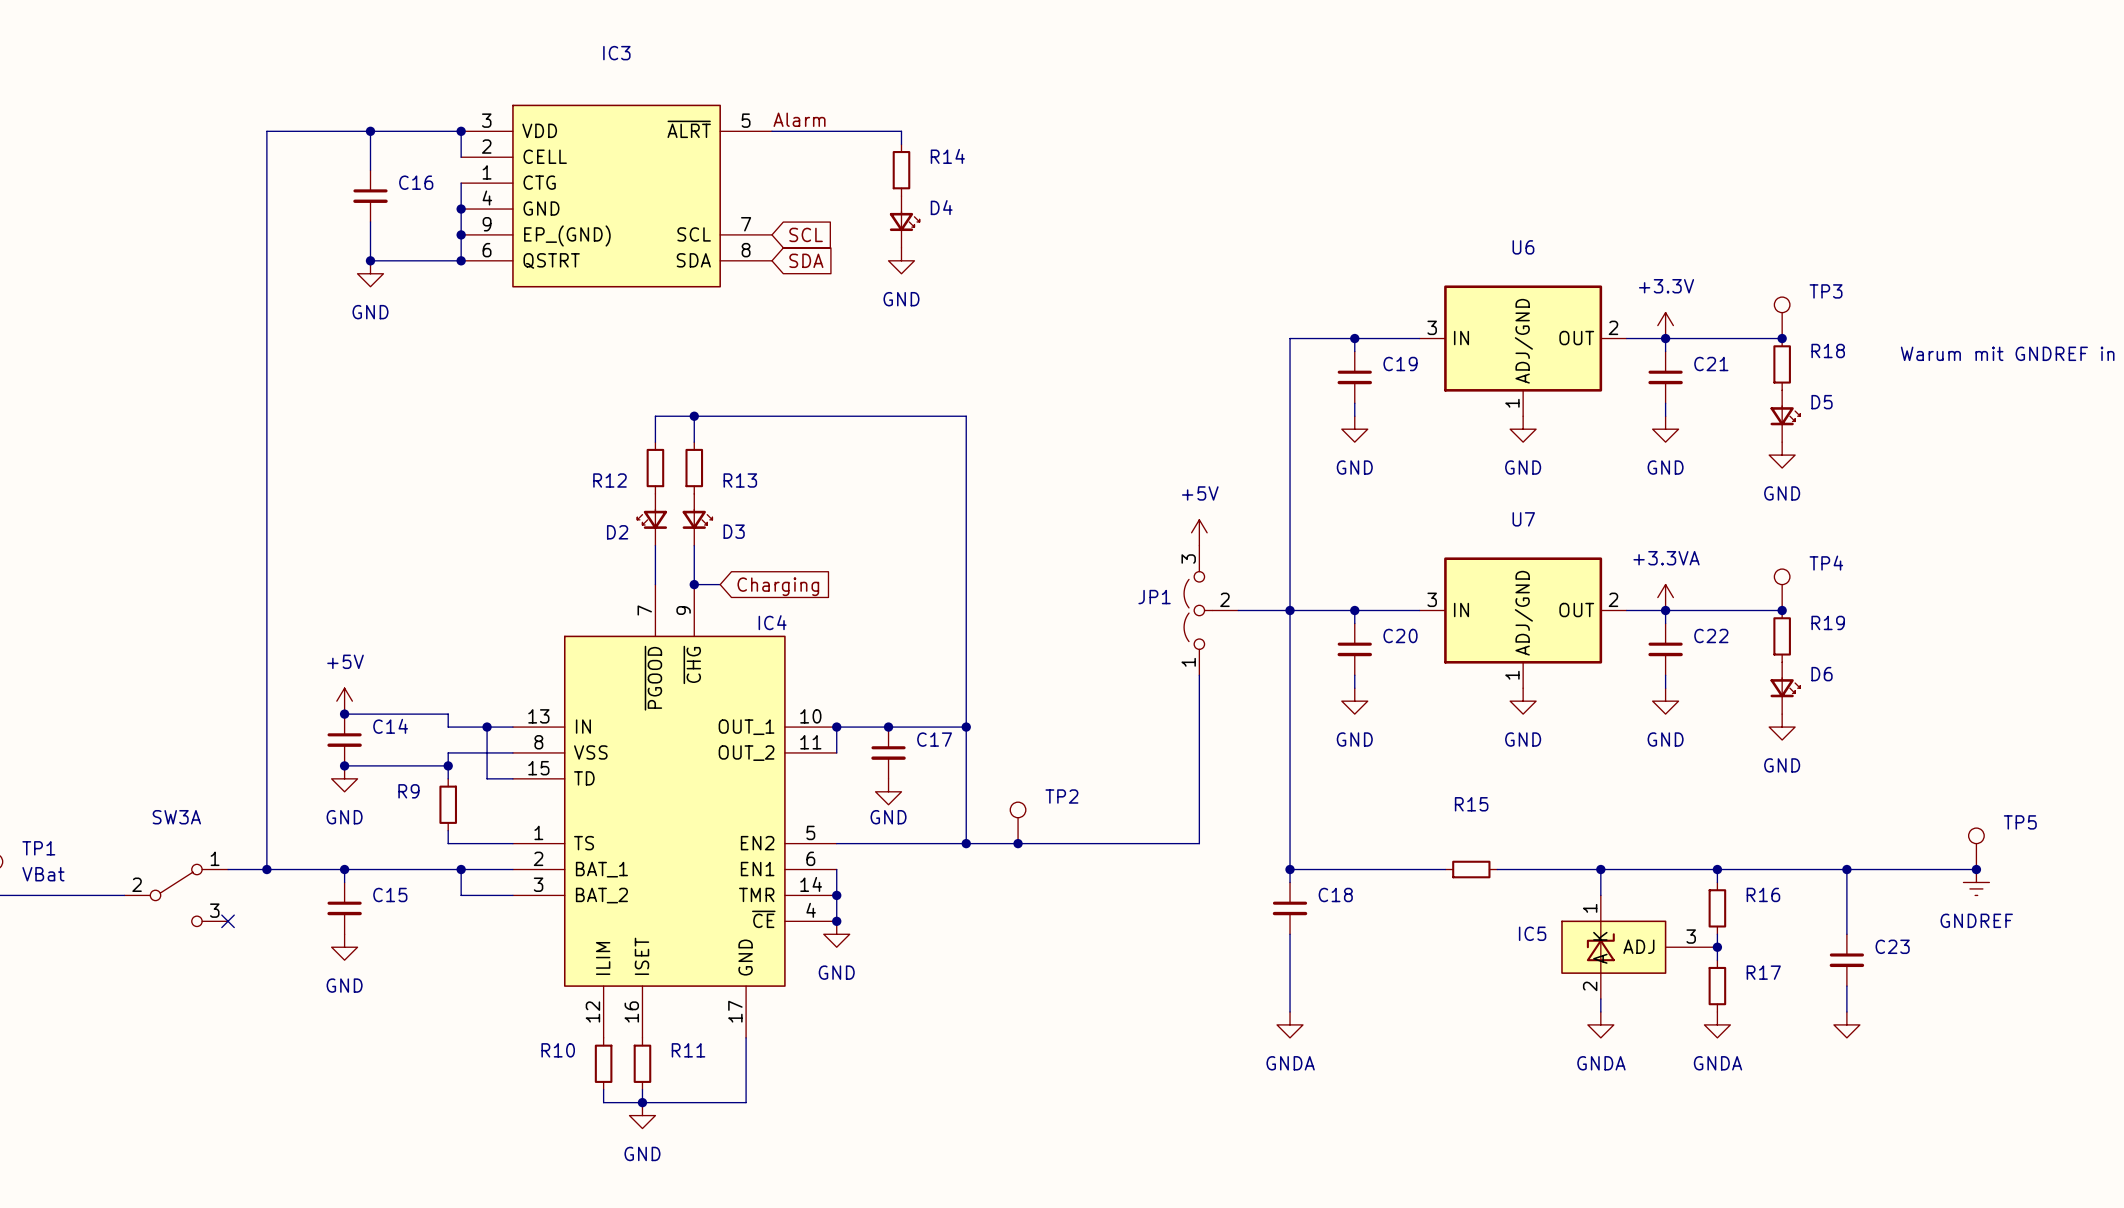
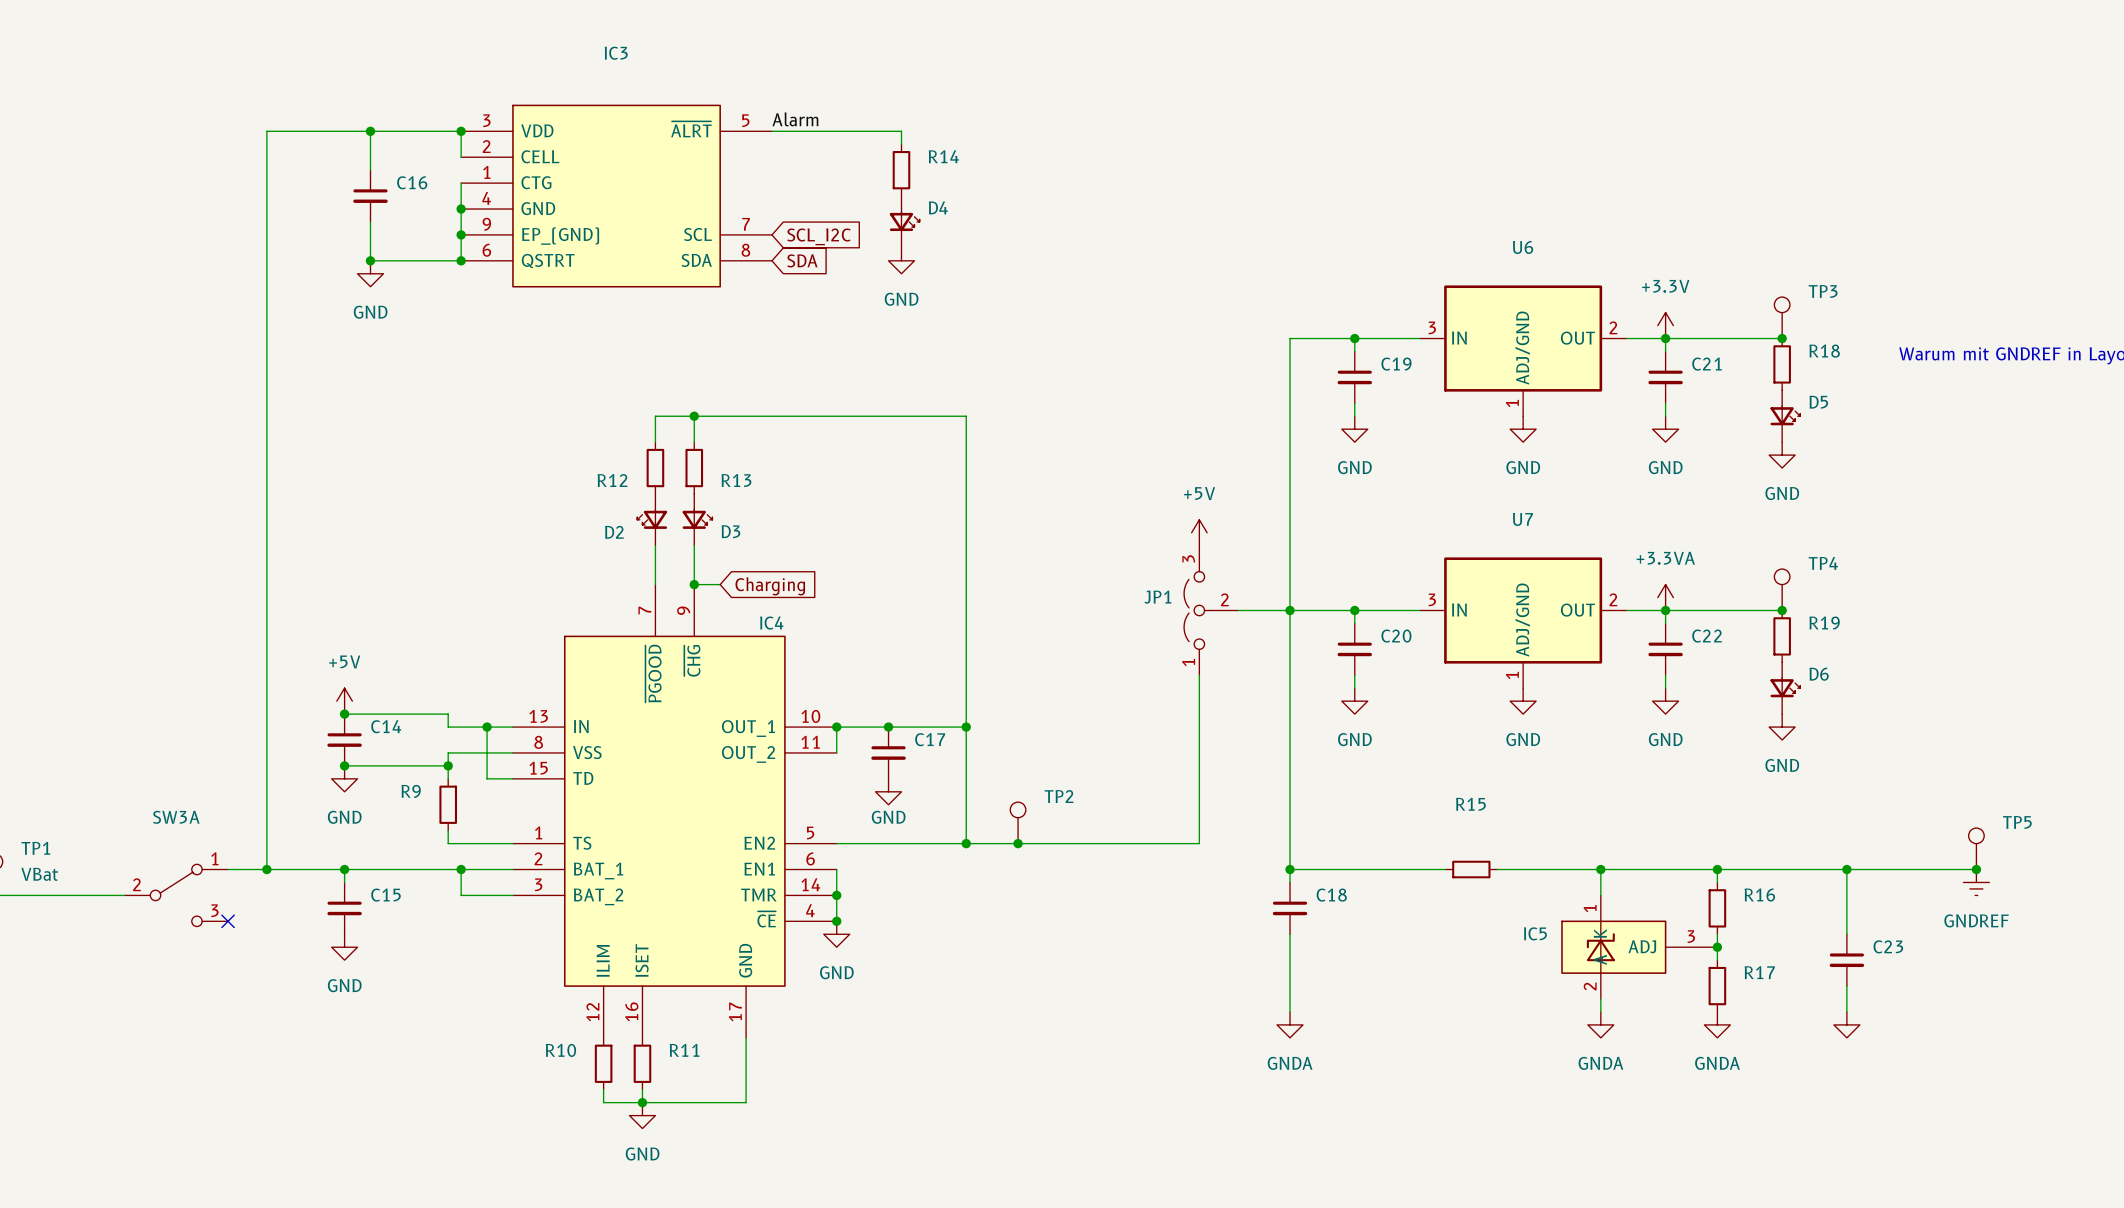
global label: SCL (806, 234) -> SCL_I2C (818, 236)

